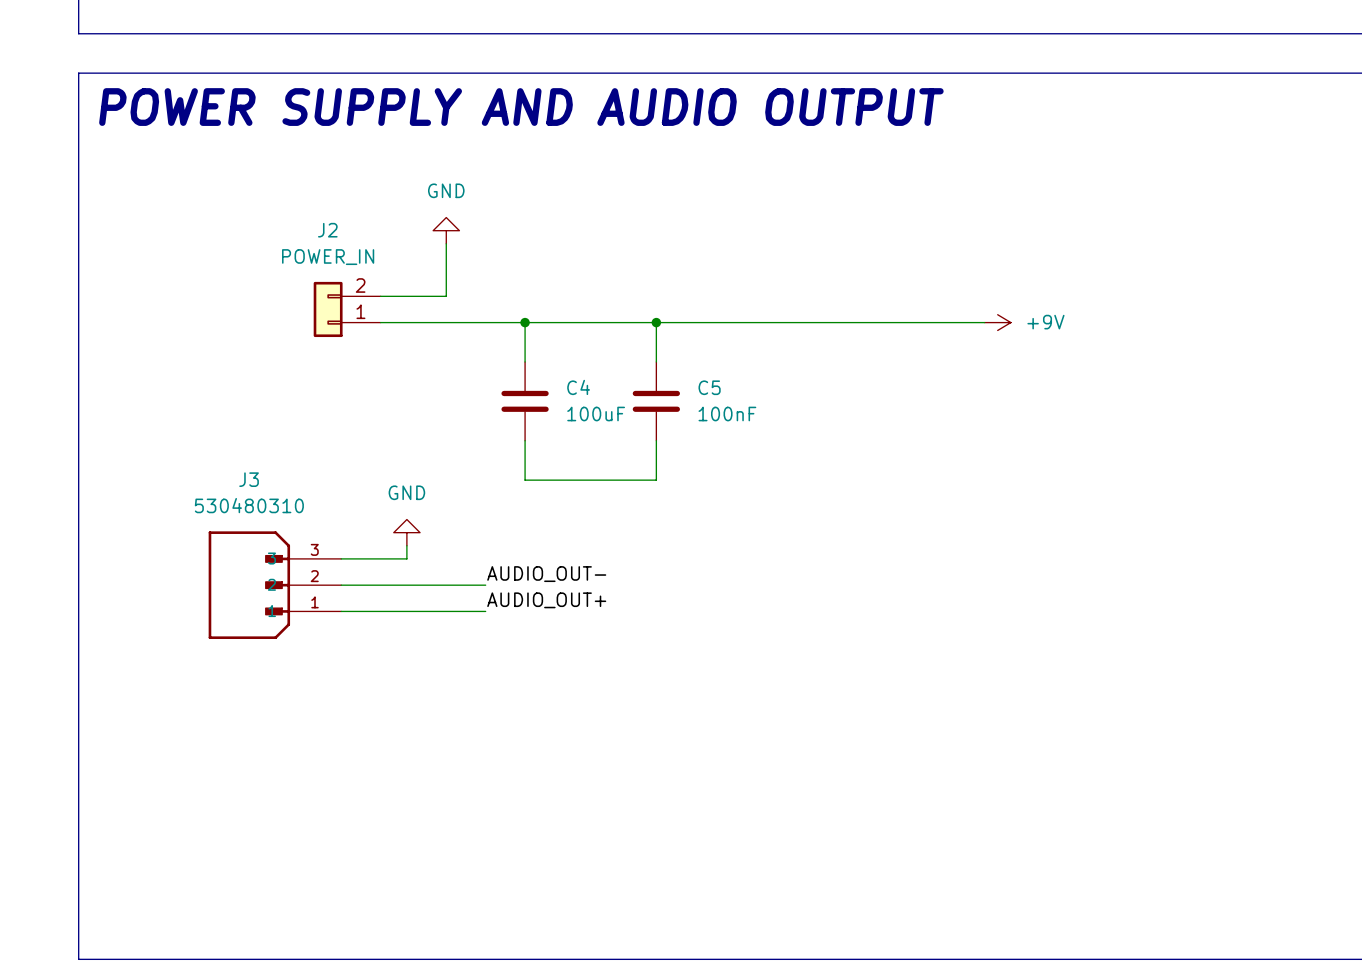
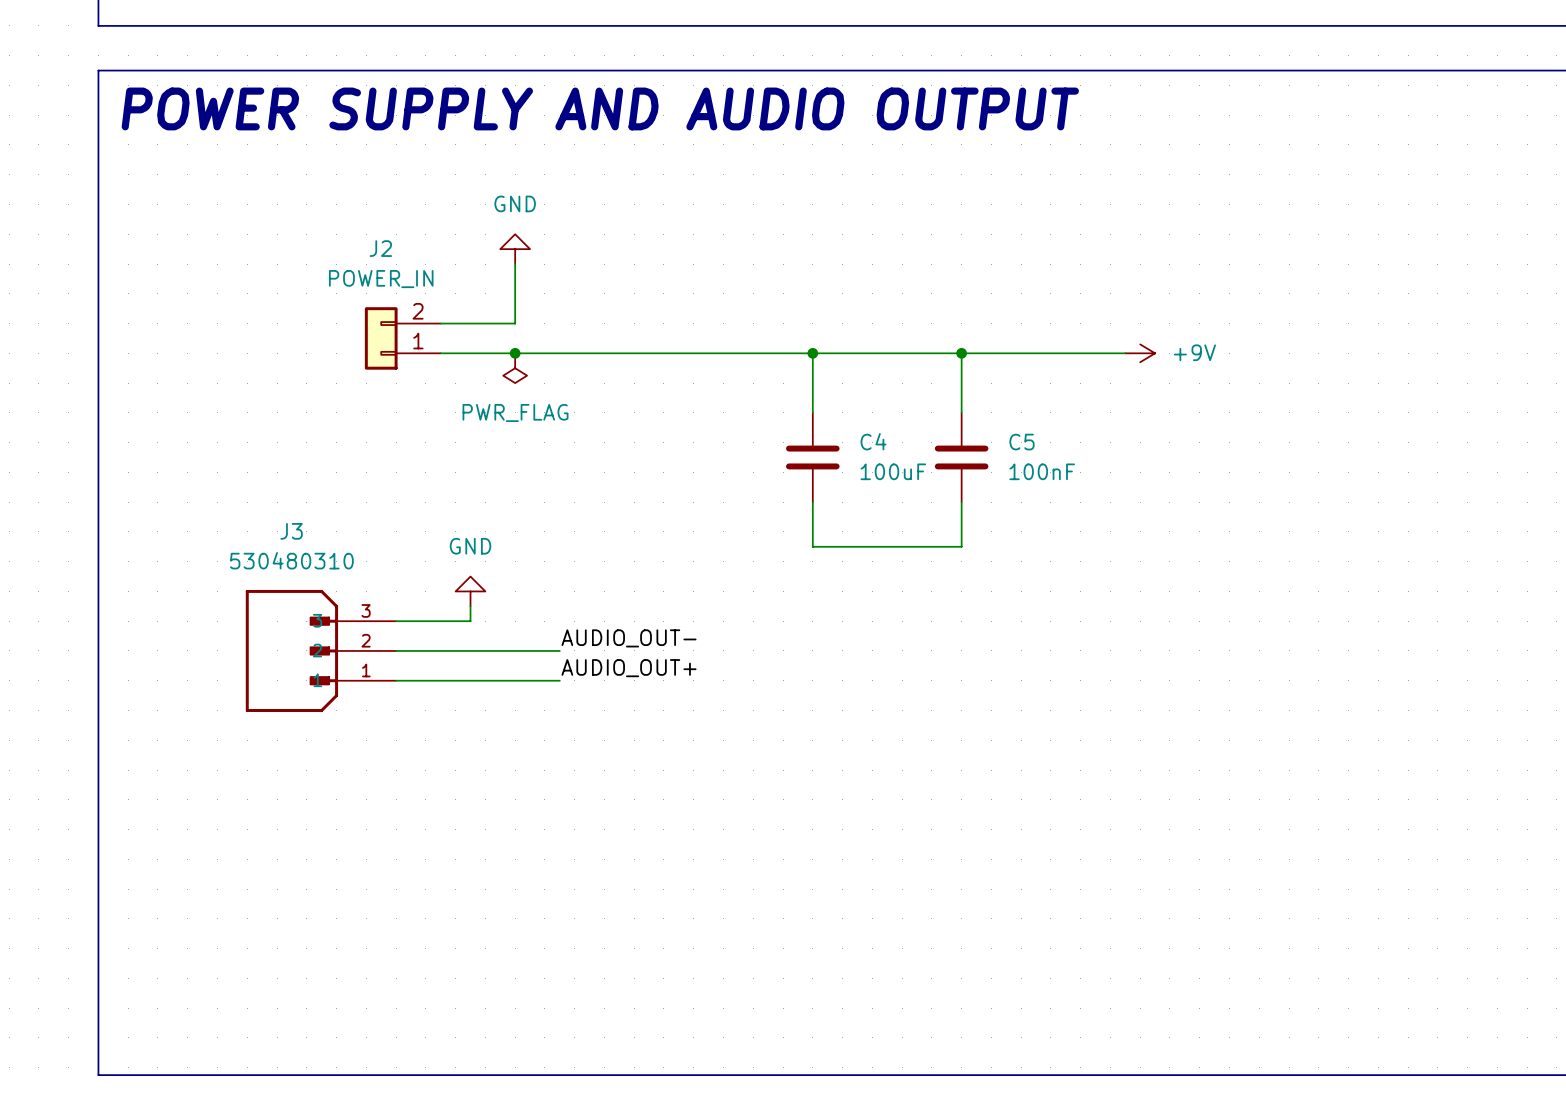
junction: none -> (515, 353)
wire: (525, 322) (525, 361) -> none
junction: (525, 322) -> none
wire: (656, 322) (656, 361) -> none
junction position: (656, 322) -> (812, 353)
wire: none -> (812, 353) (812, 412)
wire: none -> (961, 353) (961, 412)
junction: none -> (961, 353)
power symbol: none -> PWR_FLAG (515, 368)
C4 position: (525, 401) -> (812, 457)
C5 position: (656, 401) -> (961, 457)
wire: (525, 440) (525, 480) (656, 480) (656, 440) -> (812, 502) (812, 546) (961, 546) (961, 502)

